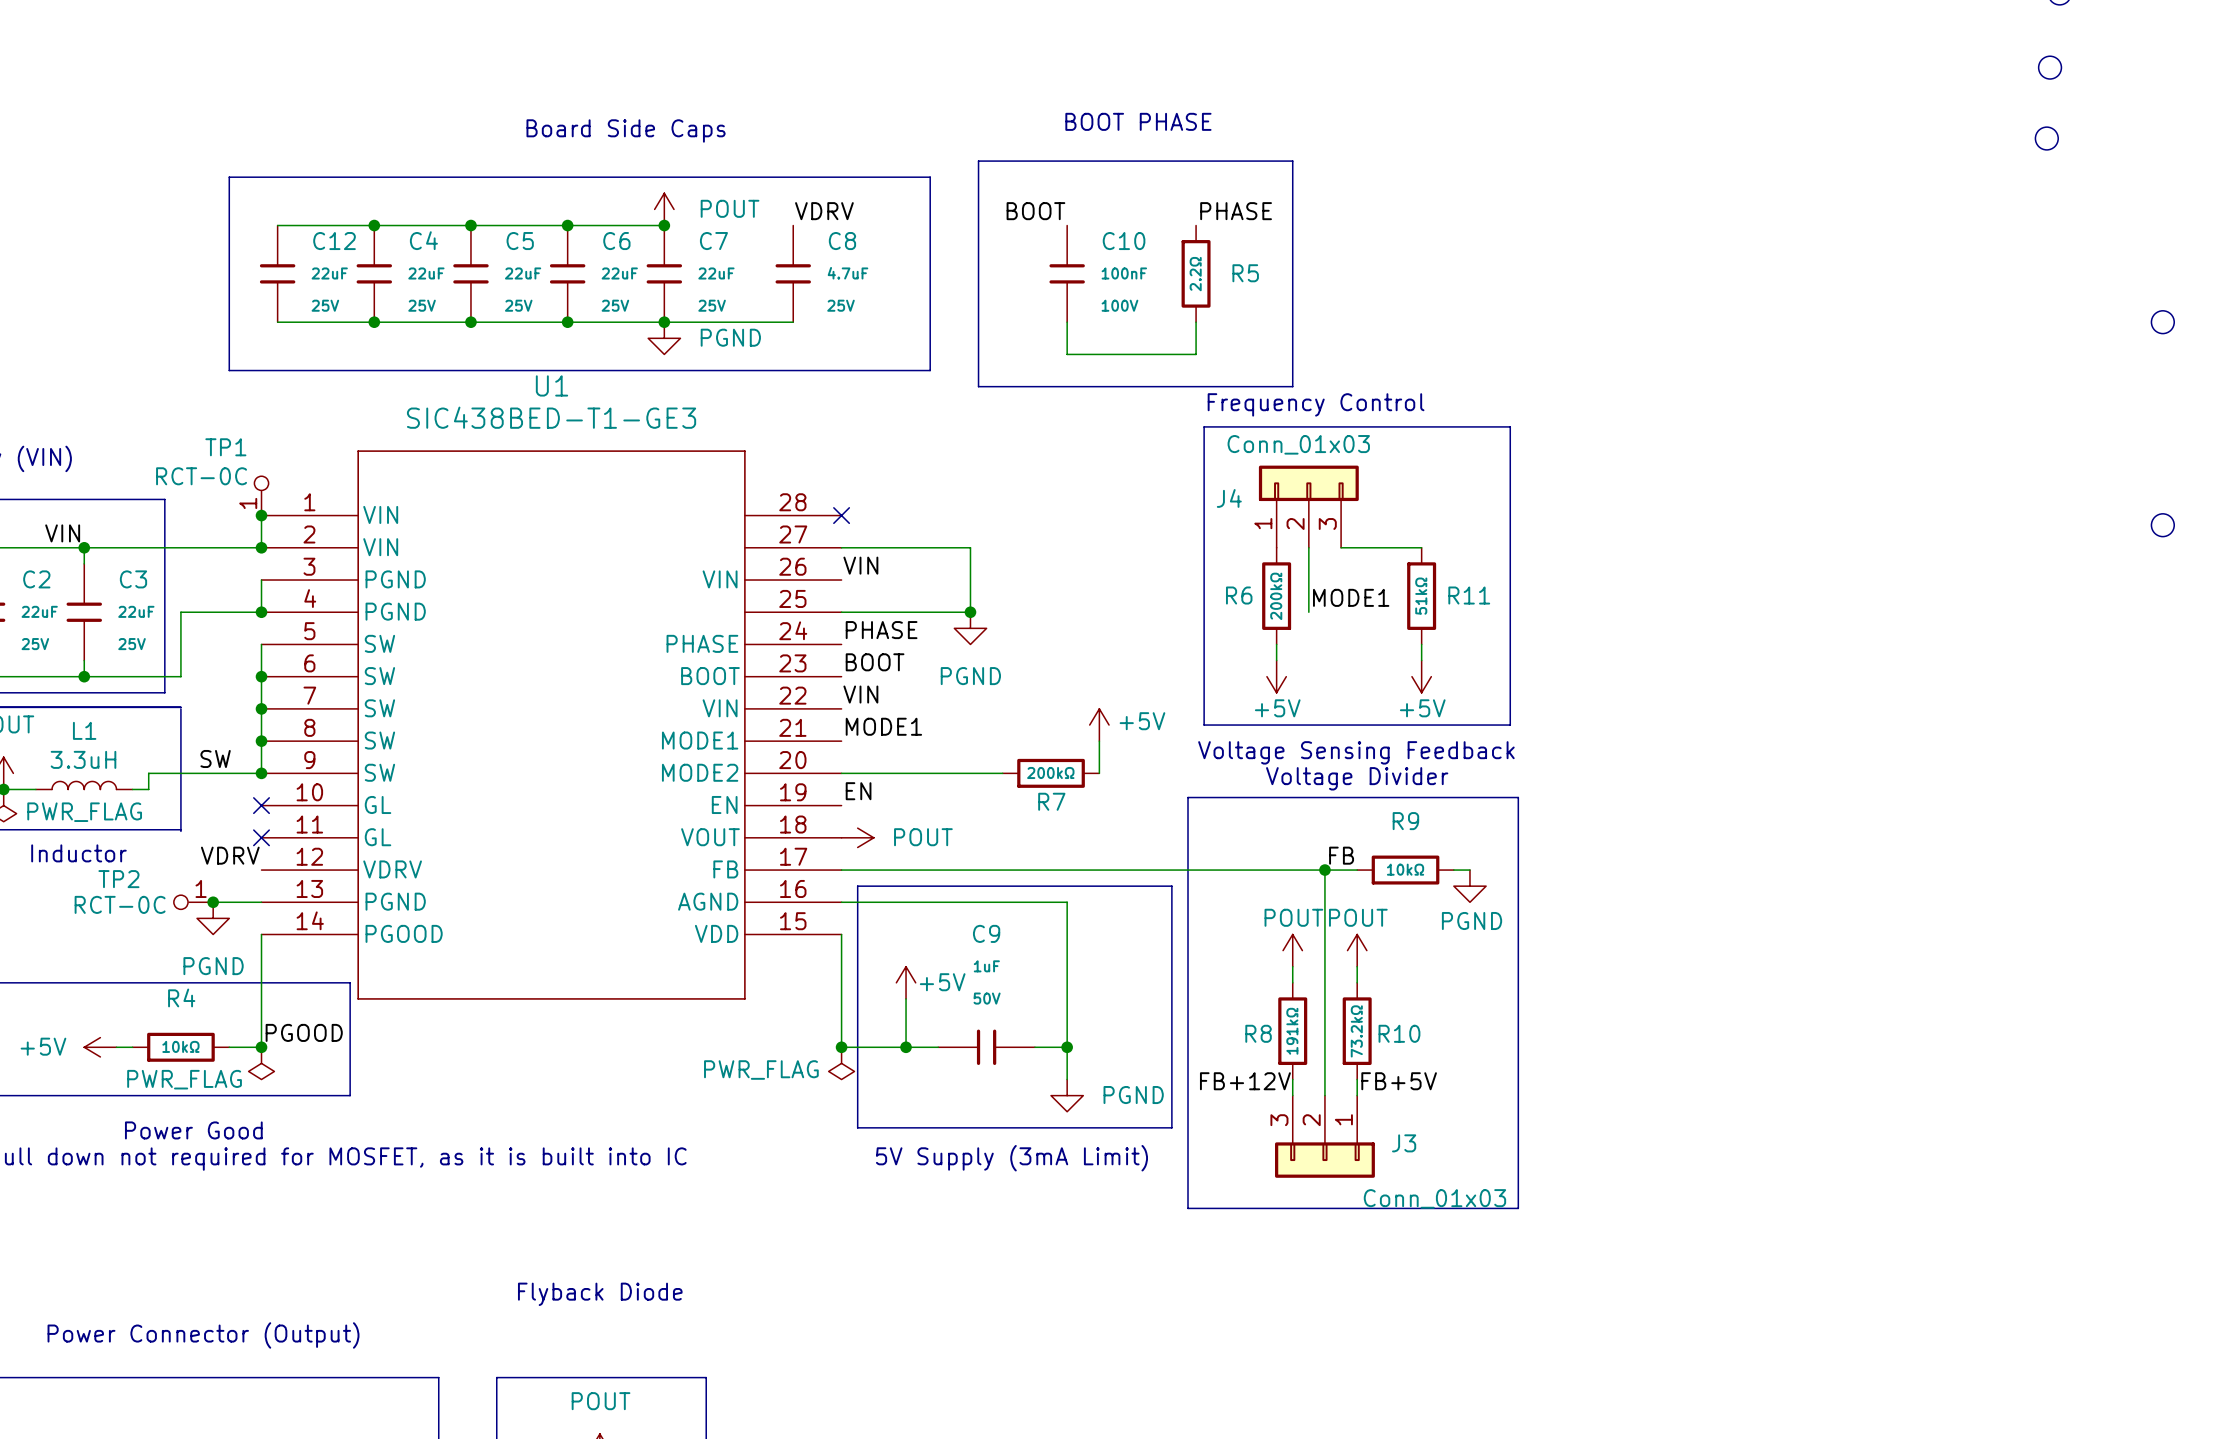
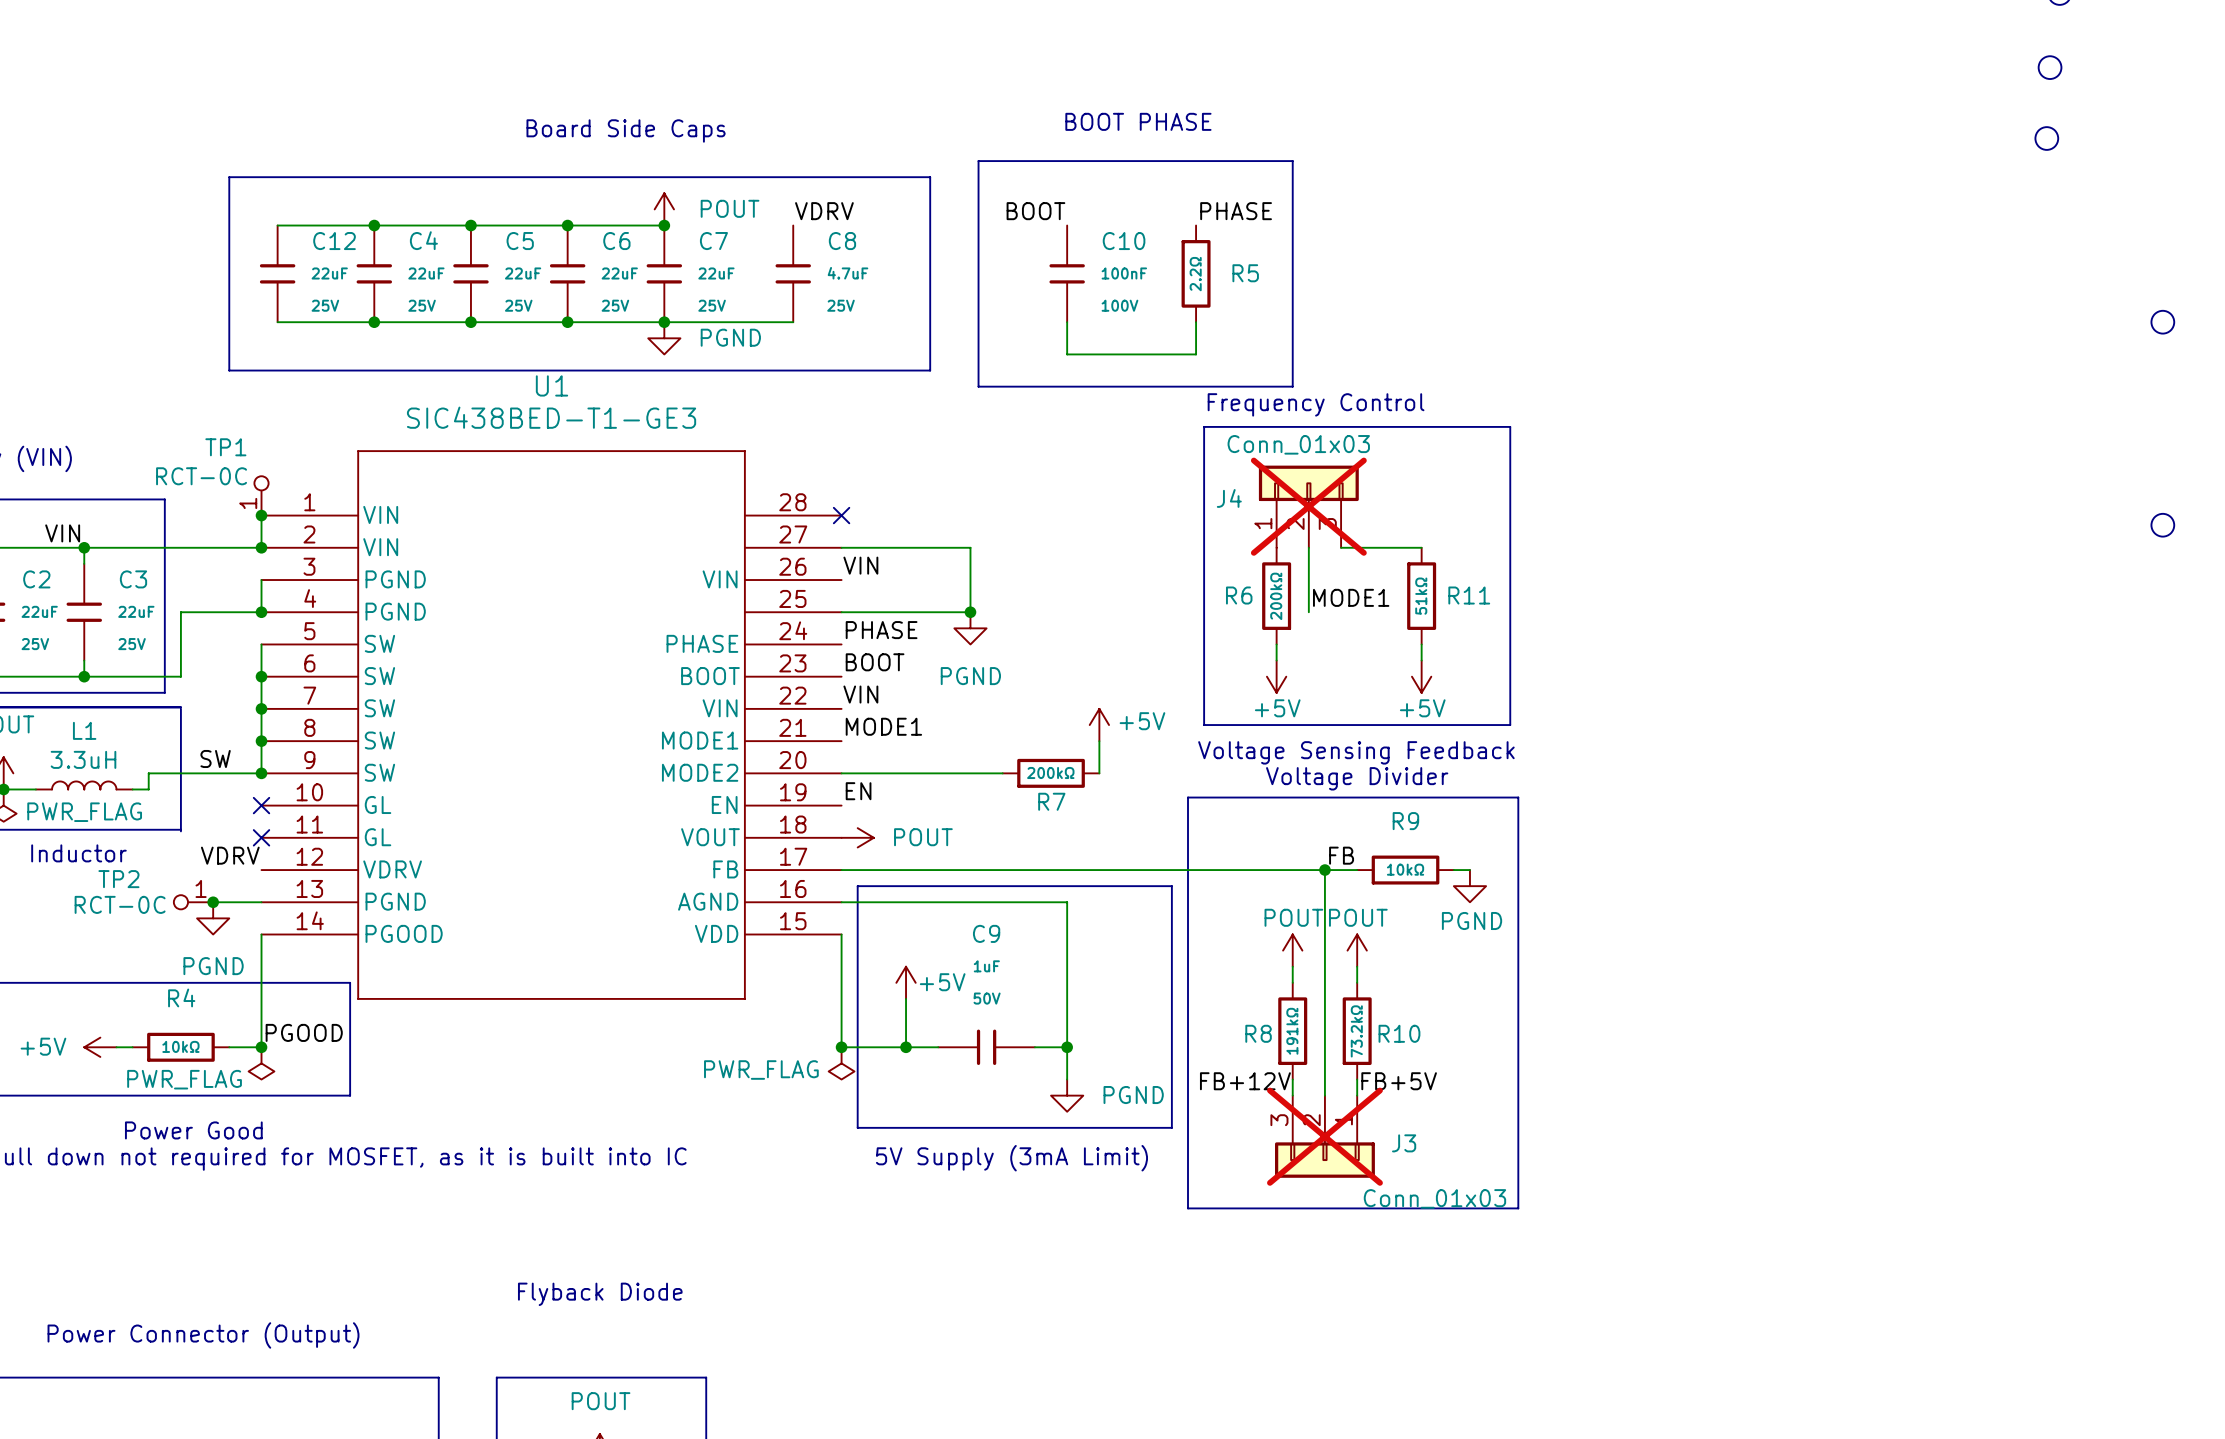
J4 do-not-place cross: none -> (1308, 506)
J3 do-not-place cross: none -> (1324, 1136)

